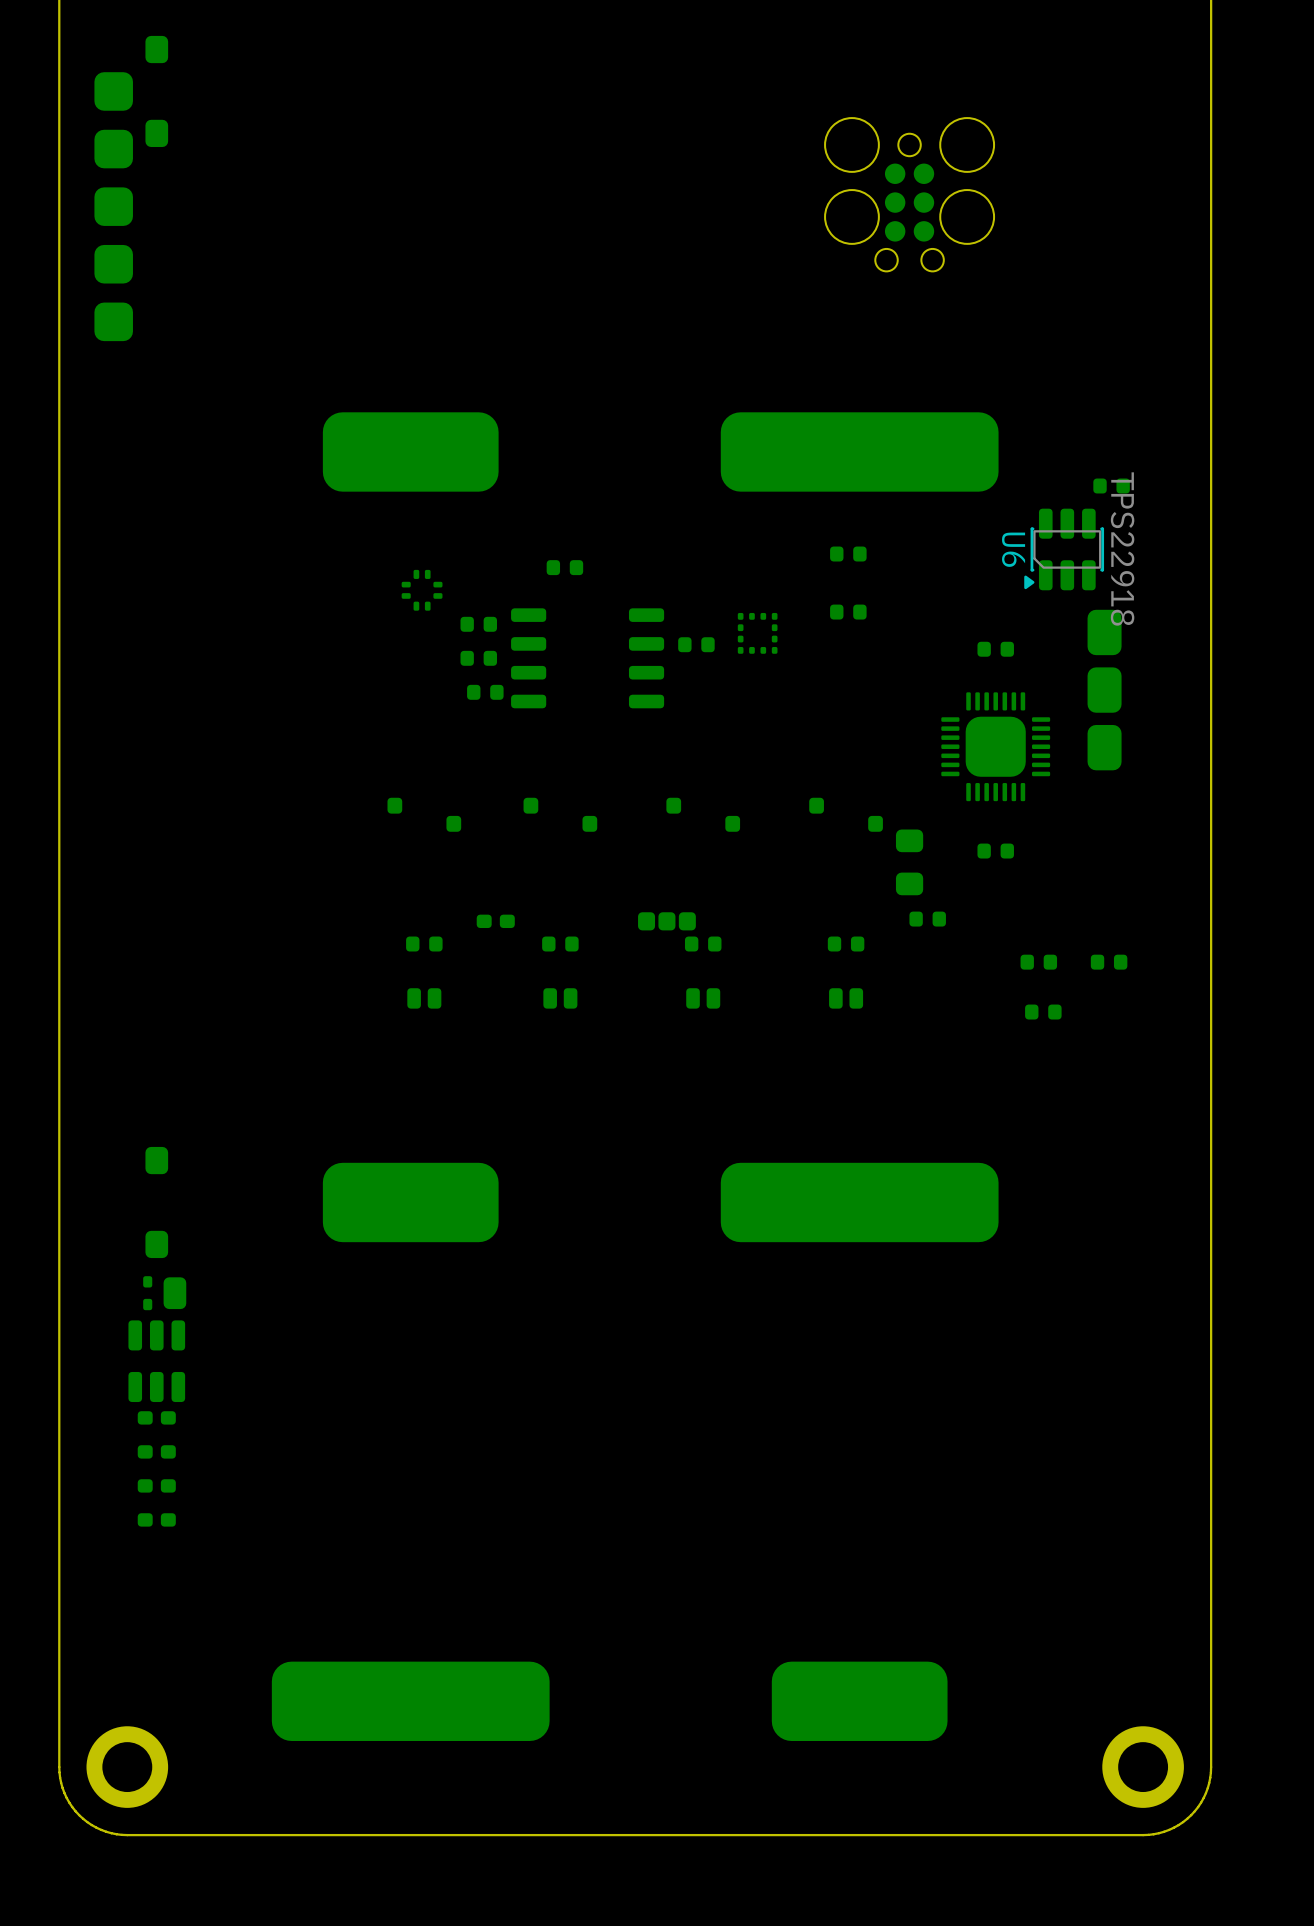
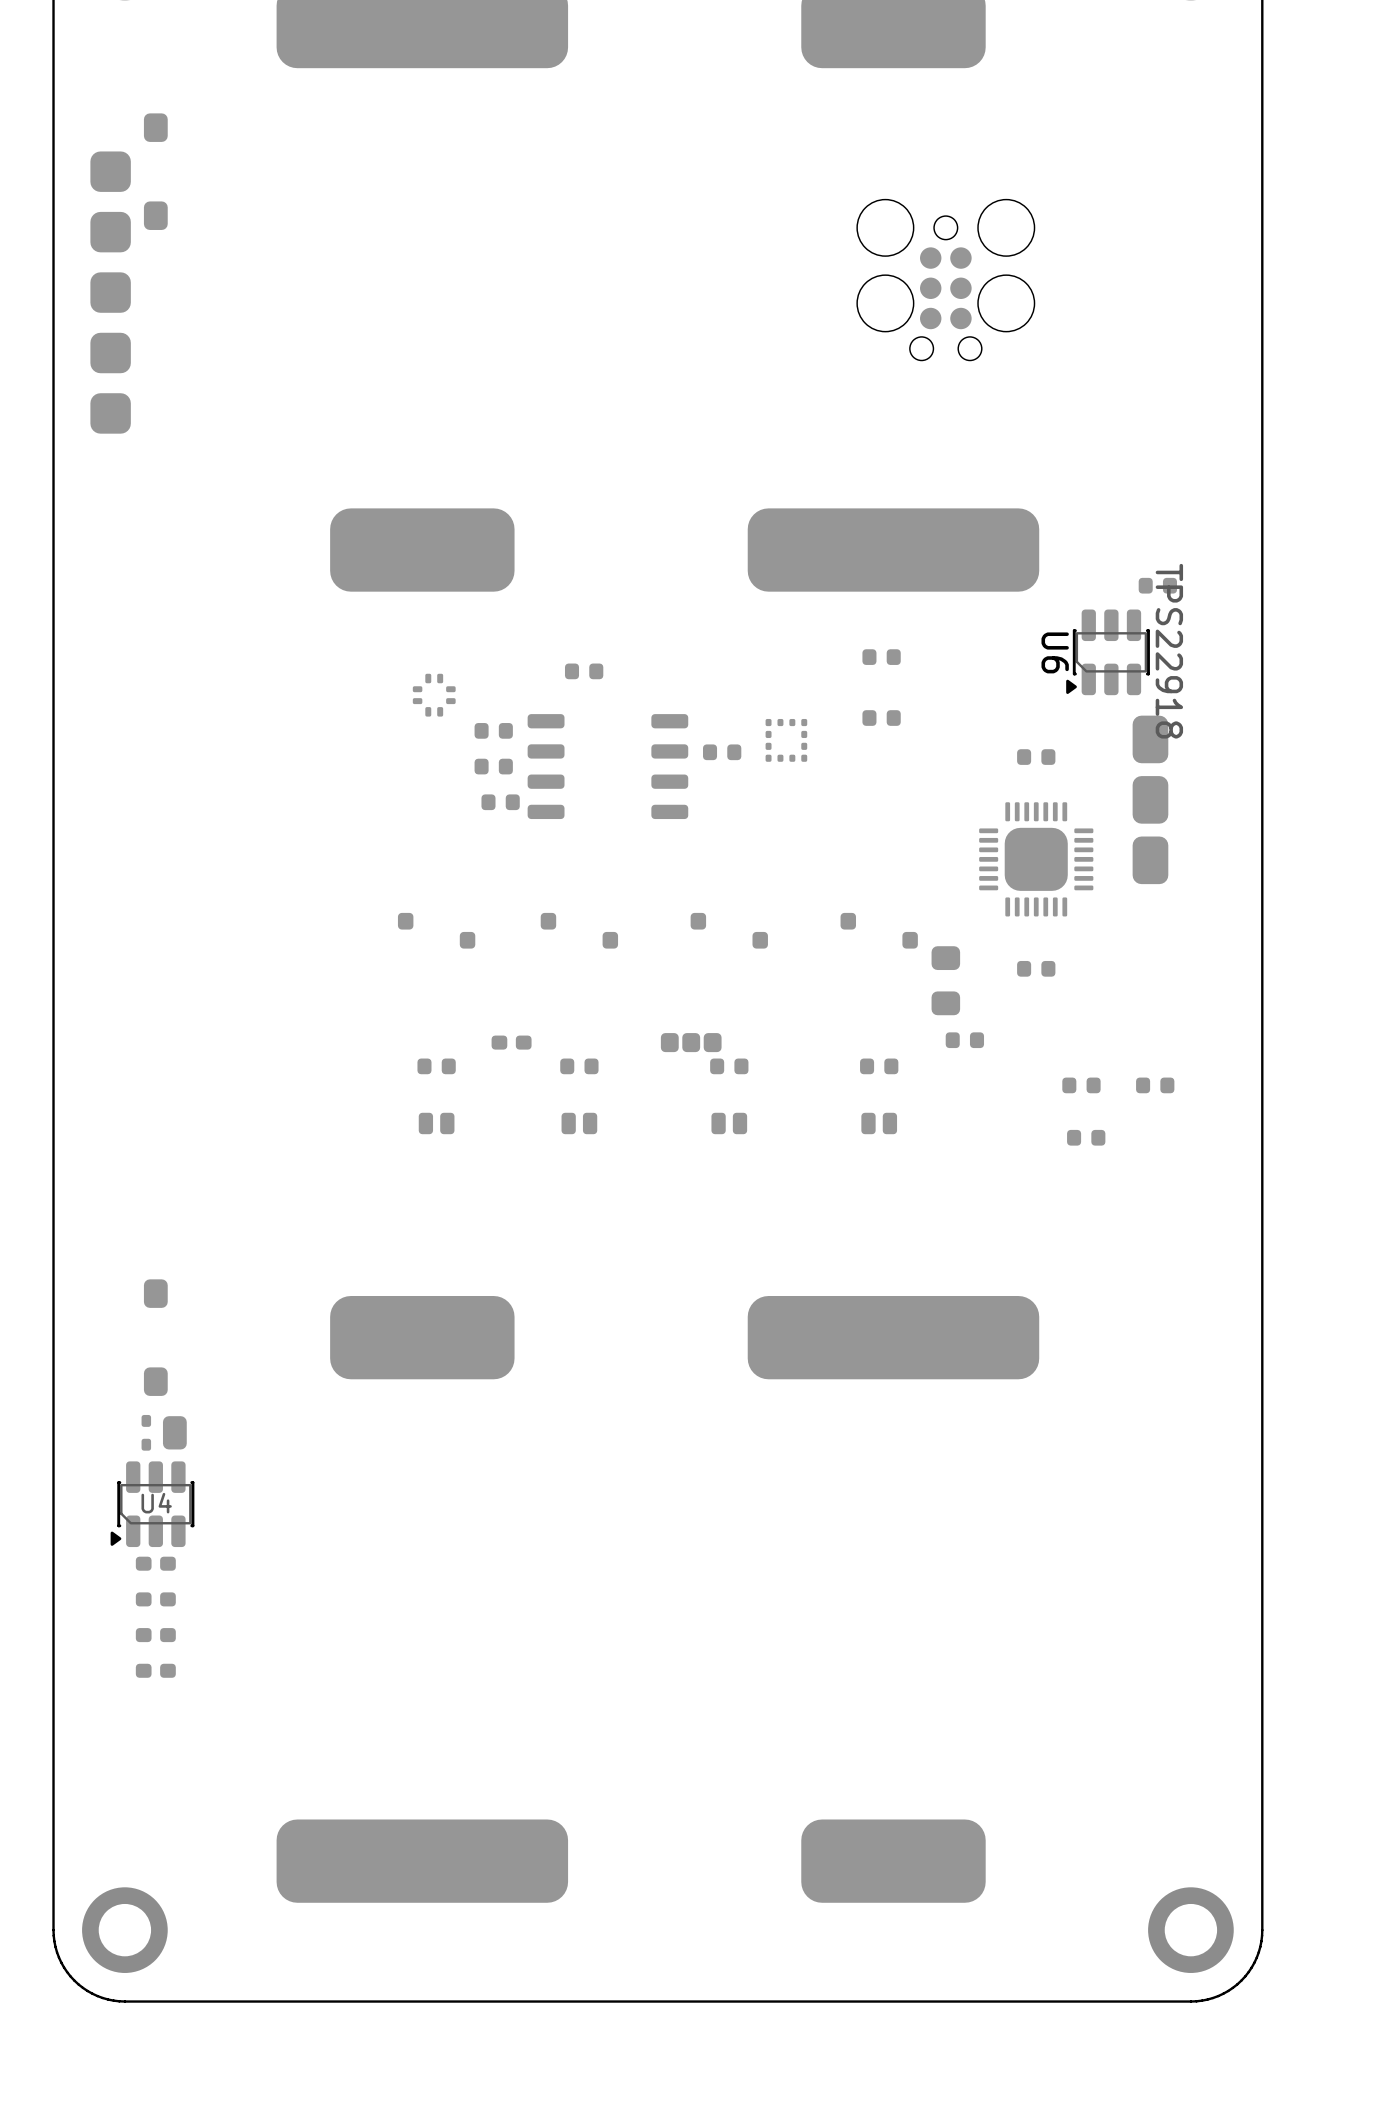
U4: none -> (152, 1504)
part: (156, 1361) -> none

